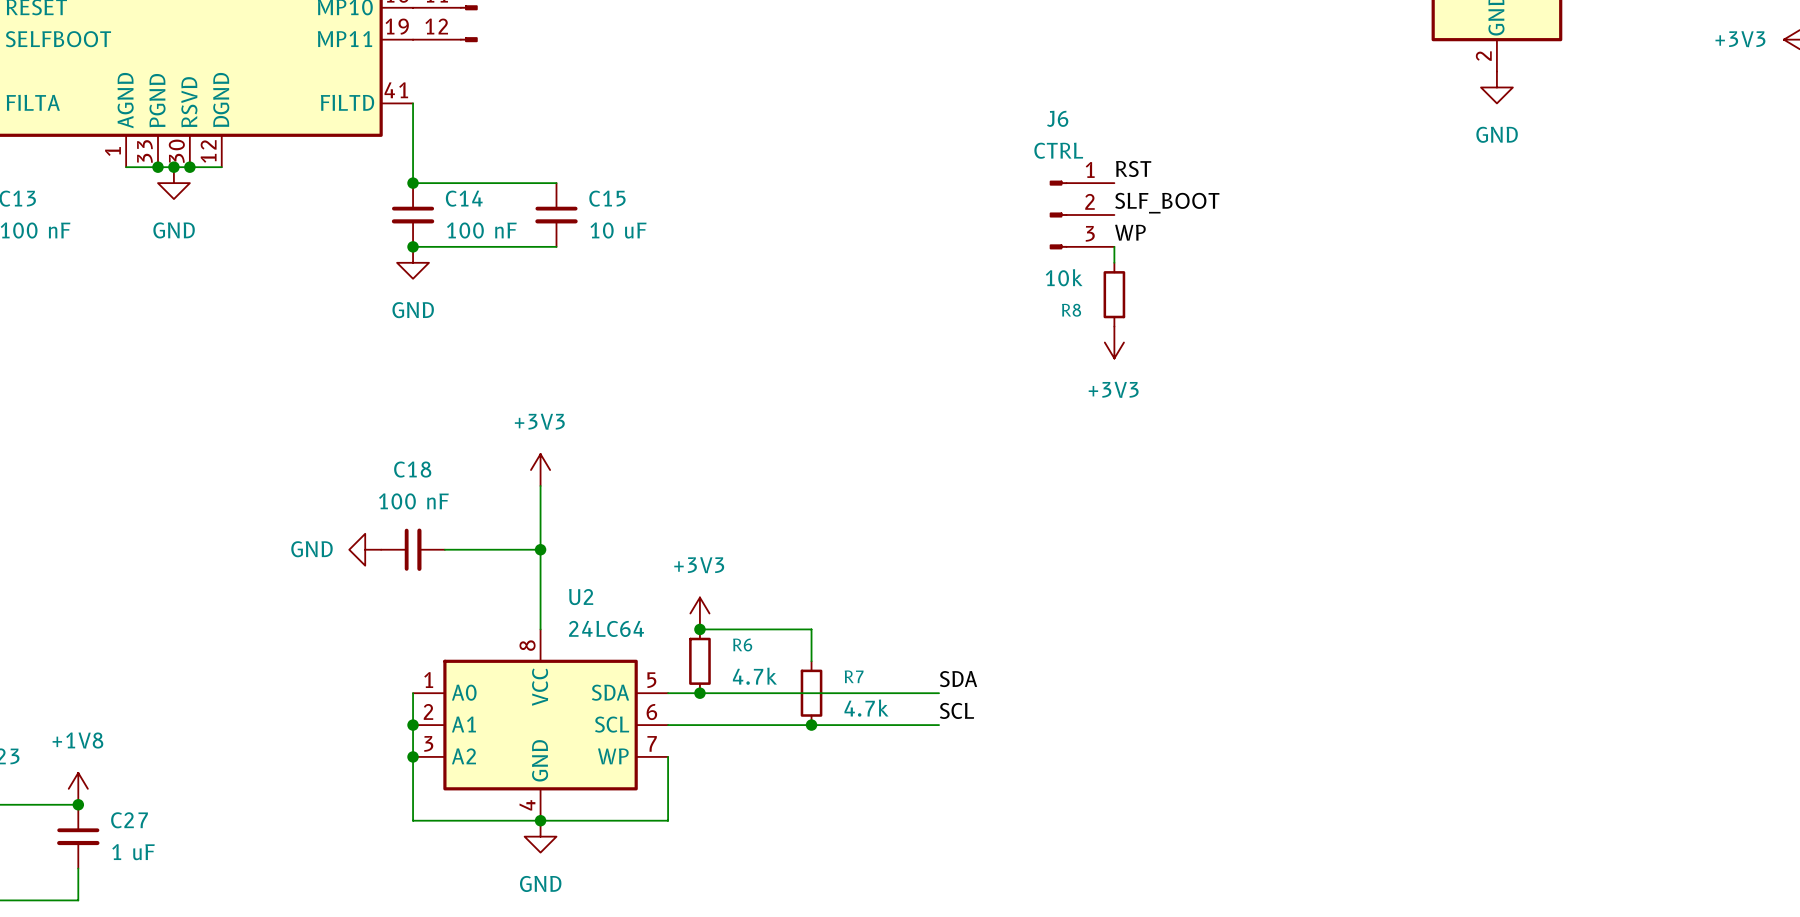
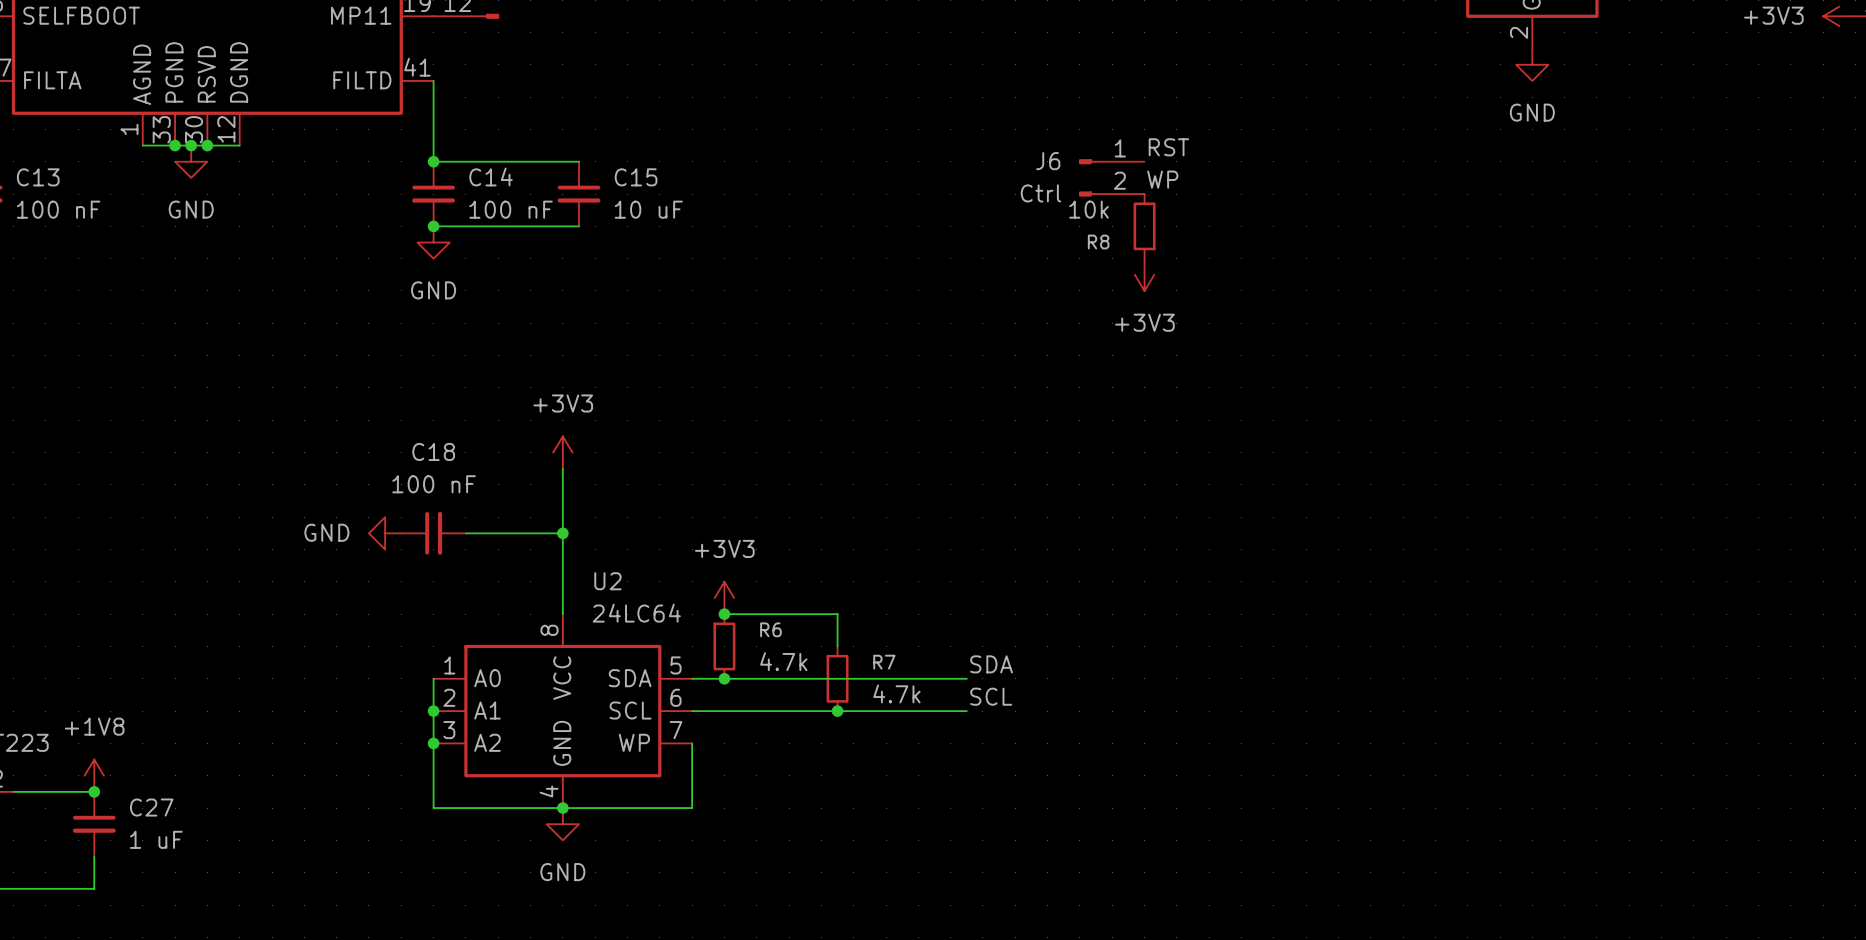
J6 name position: J6 (1057, 118) -> J6 (1048, 161)
J6 value: CTRL (1058, 150) -> Ctrl (1040, 193)
J6 symbol: [1049, 180, 1115, 250] -> [1078, 159, 1145, 197]
label: SLF_BOOT (1167, 203) -> WP (1162, 179)
label: WP (1130, 232) -> none
wire: (1114, 246) (1114, 262) -> none
R8 position: (1114, 294) -> (1144, 226)
power symbol position: +3V3 (1114, 342) -> +3V3 (1144, 274)

